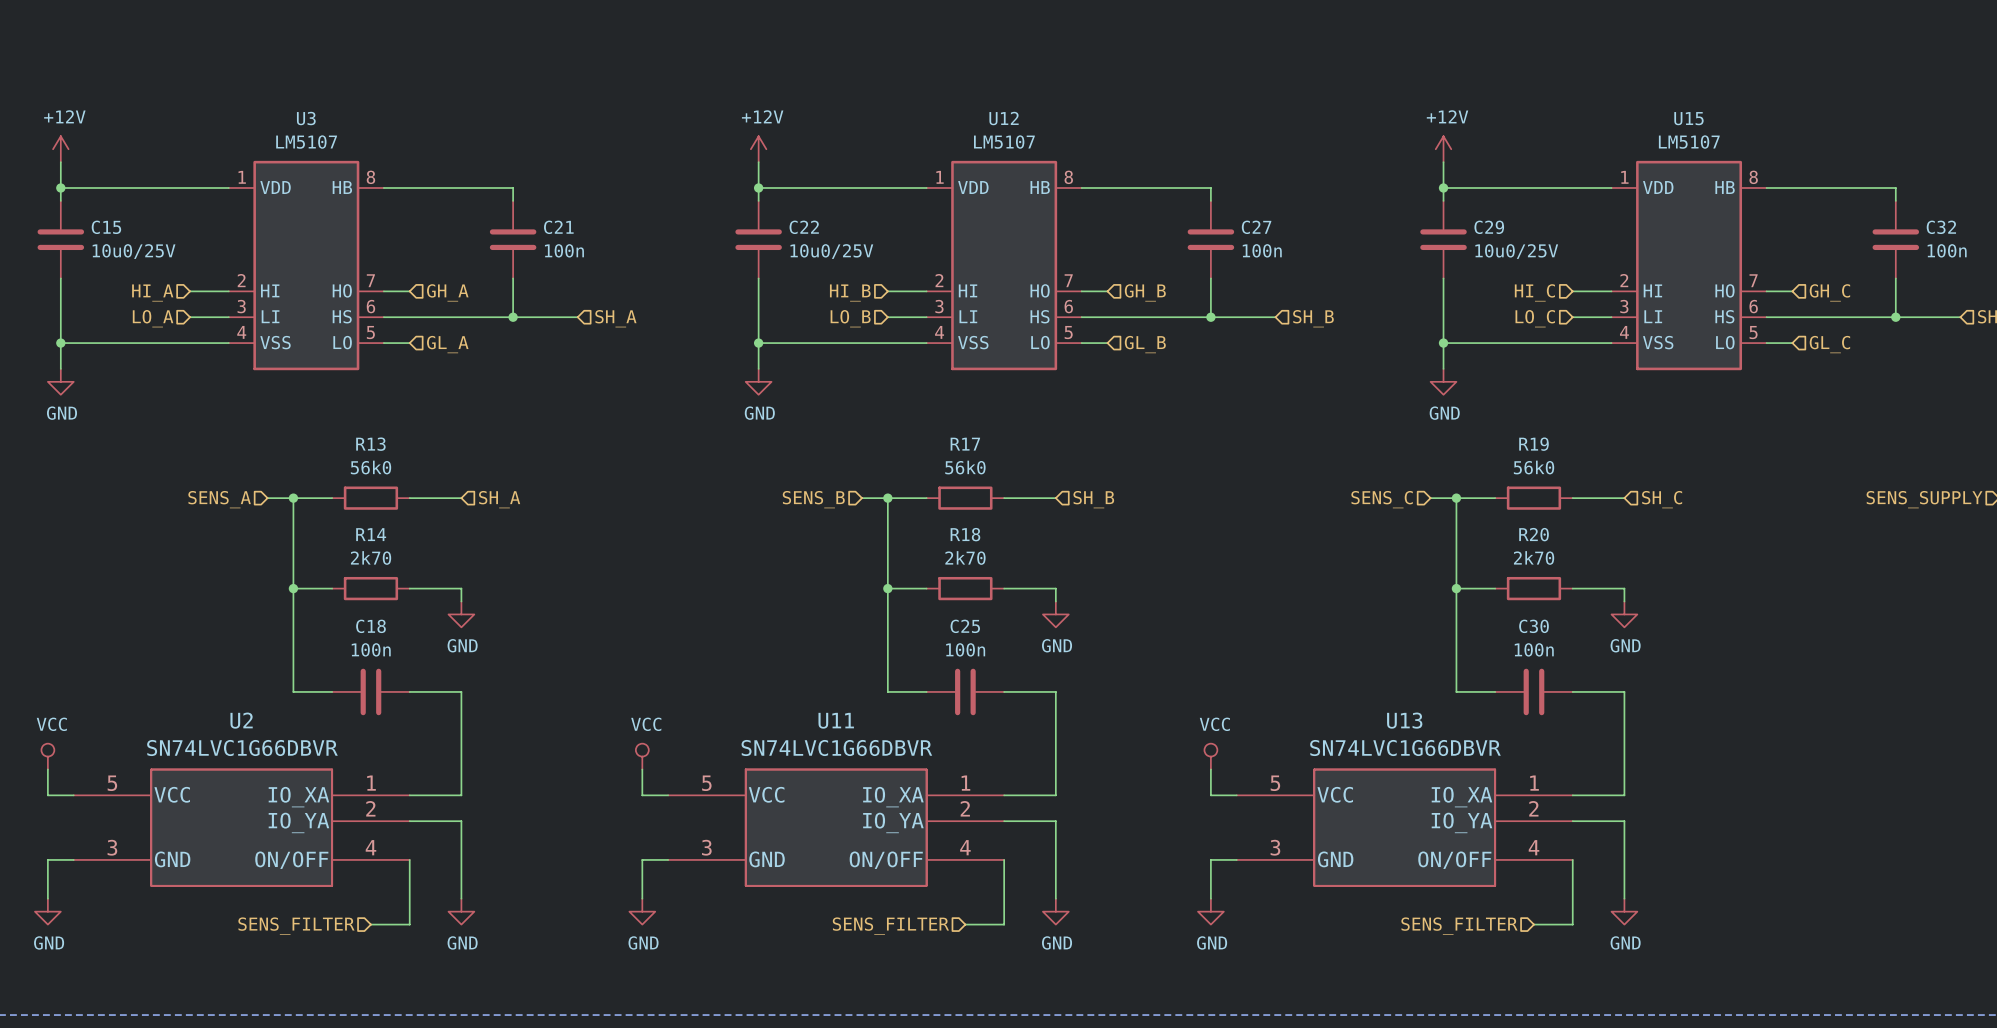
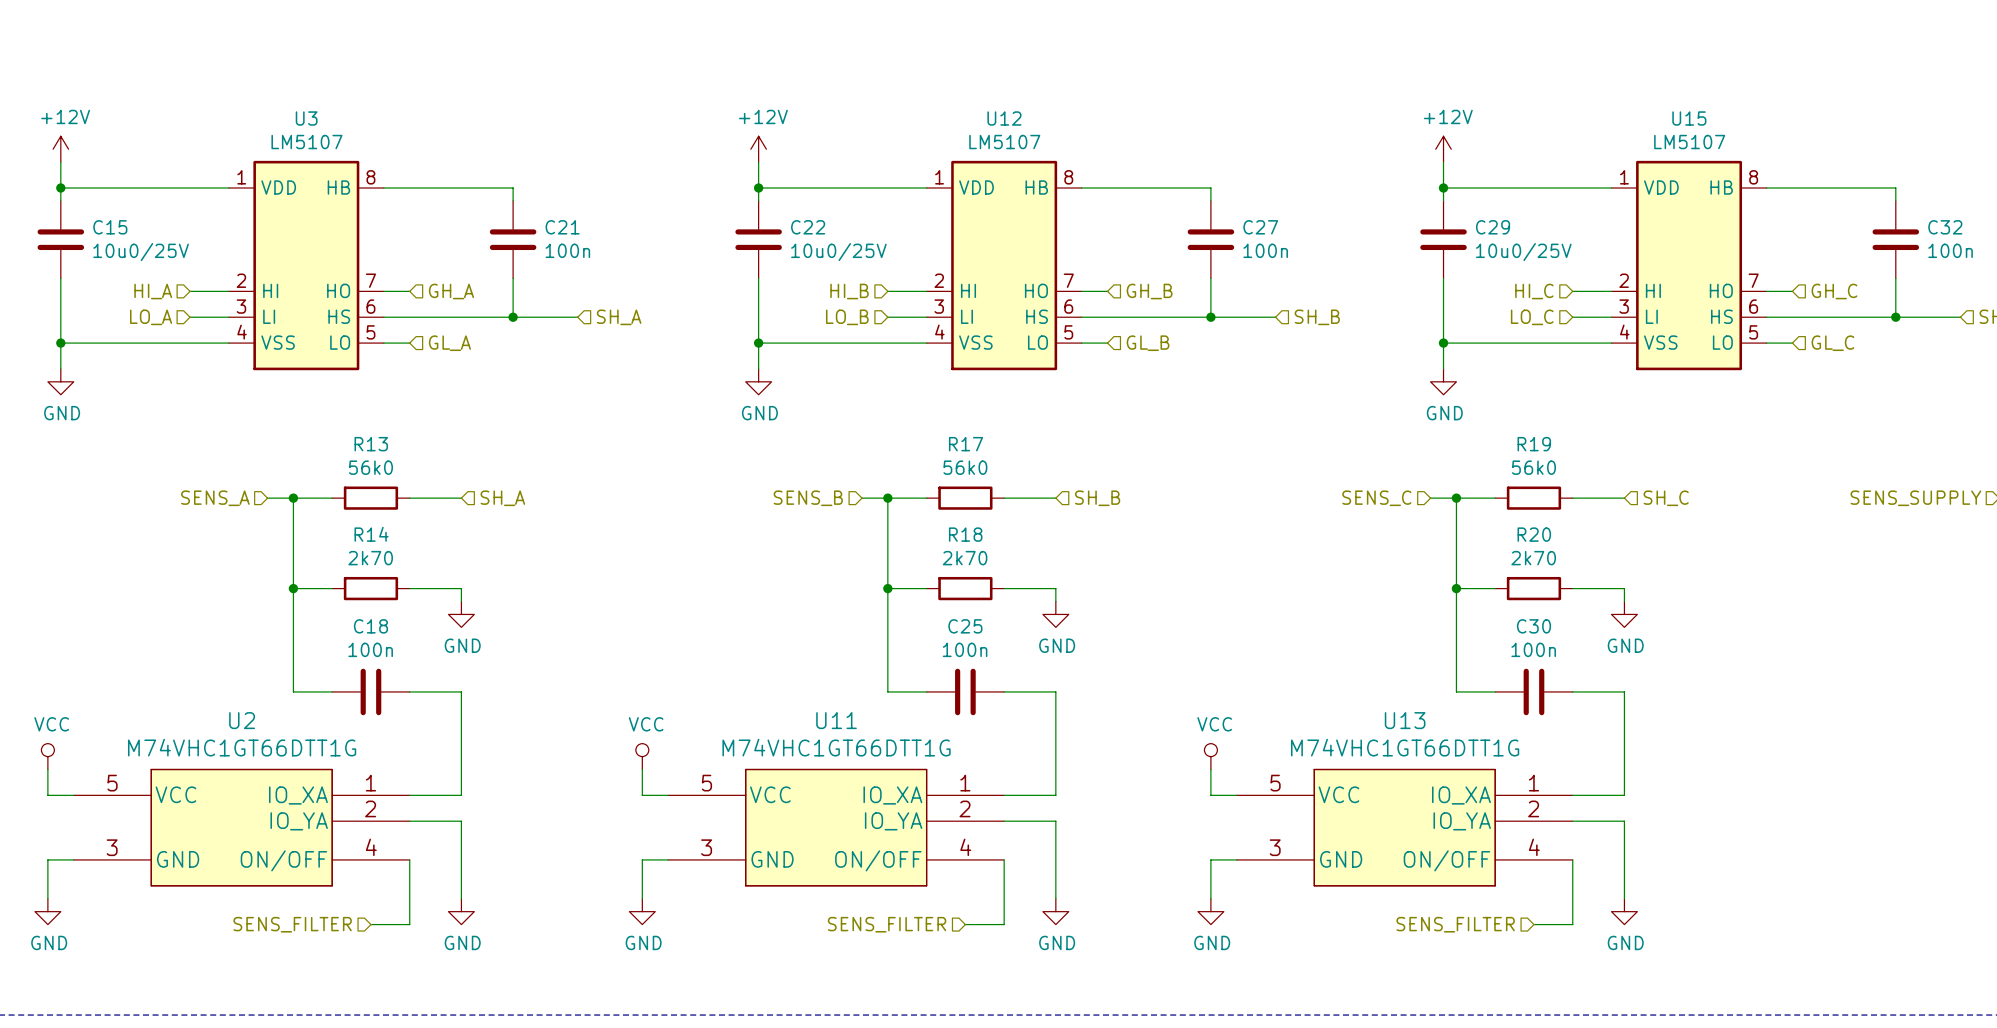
U2 value: SN74LVC1G66DBVR (242, 748) -> M74VHC1GT66DTT1G (242, 747)
U11 value: SN74LVC1G66DBVR (836, 748) -> M74VHC1GT66DTT1G (836, 747)
U13 value: SN74LVC1G66DBVR (1405, 748) -> M74VHC1GT66DTT1G (1405, 747)

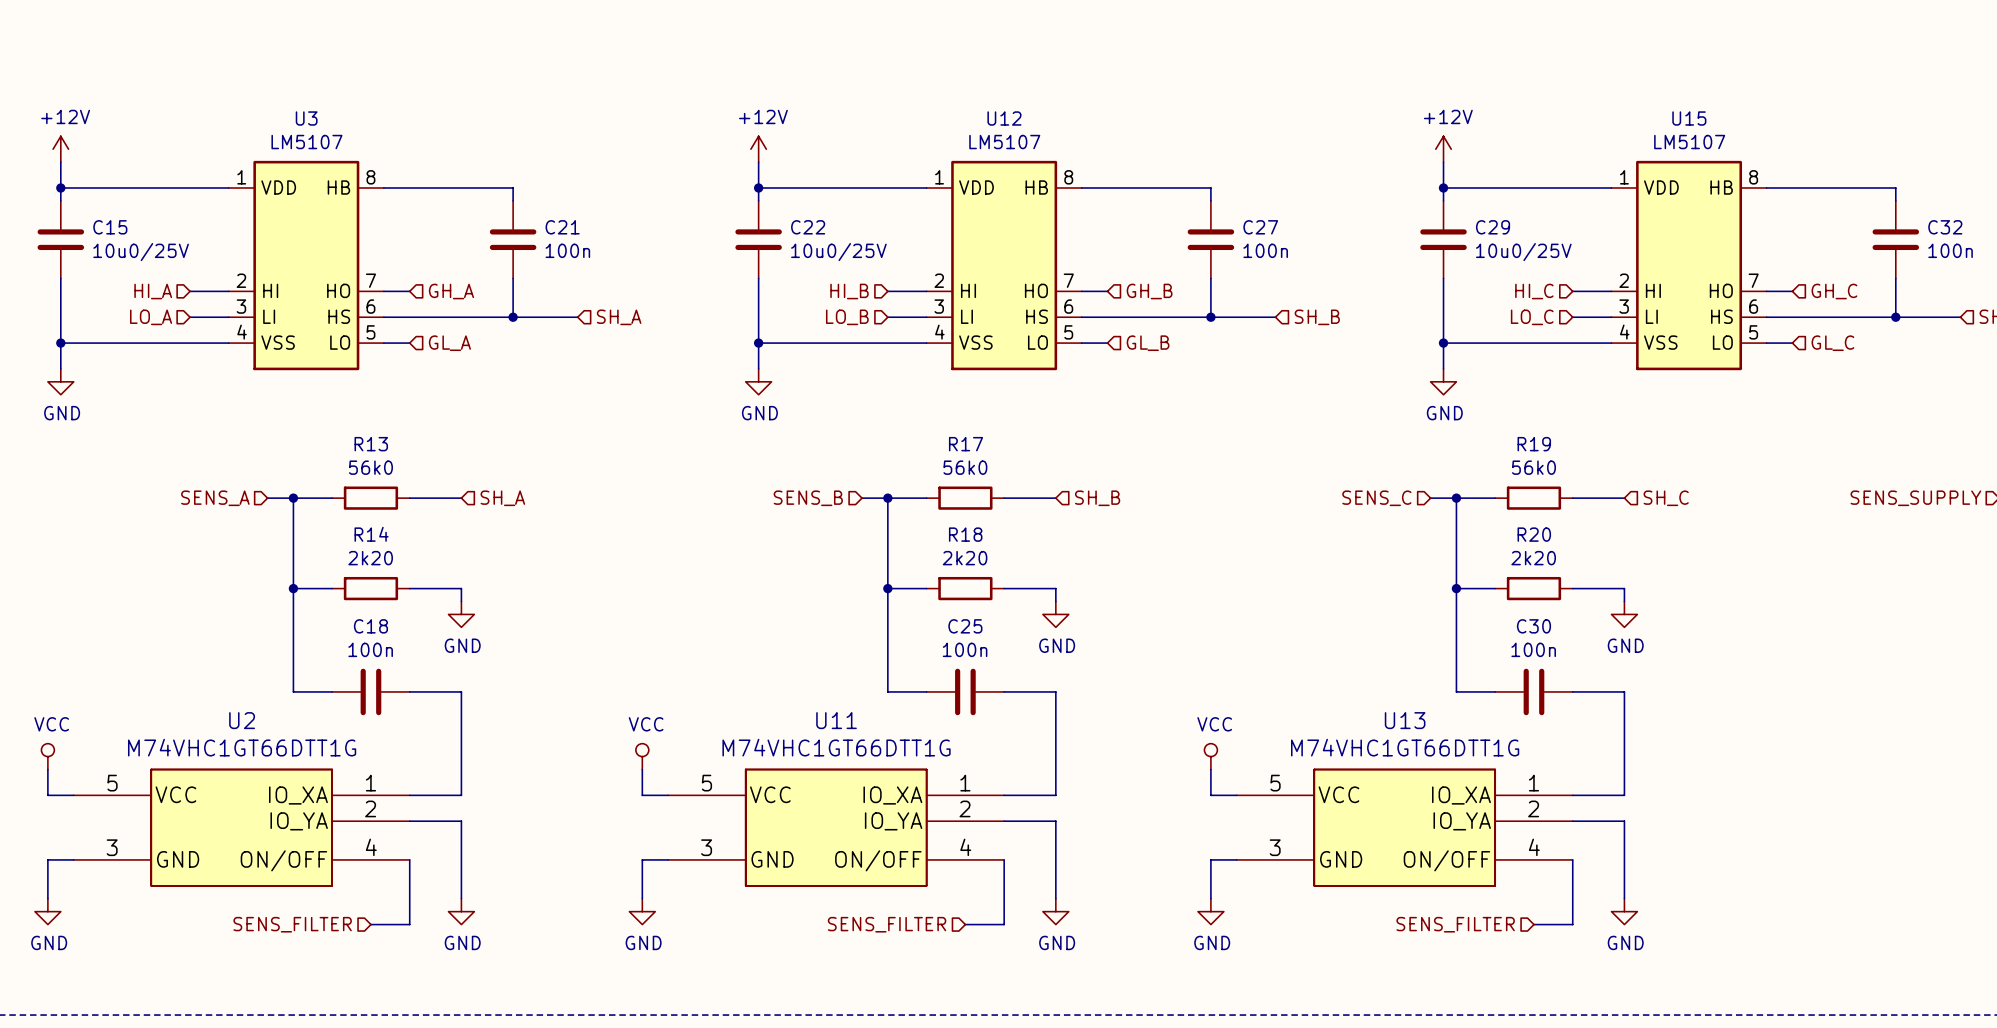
R14 value: 2k70 (370, 558) -> 2k20 (370, 558)
R18 value: 2k70 (965, 558) -> 2k20 (965, 558)
R20 value: 2k70 (1533, 558) -> 2k20 (1533, 558)

